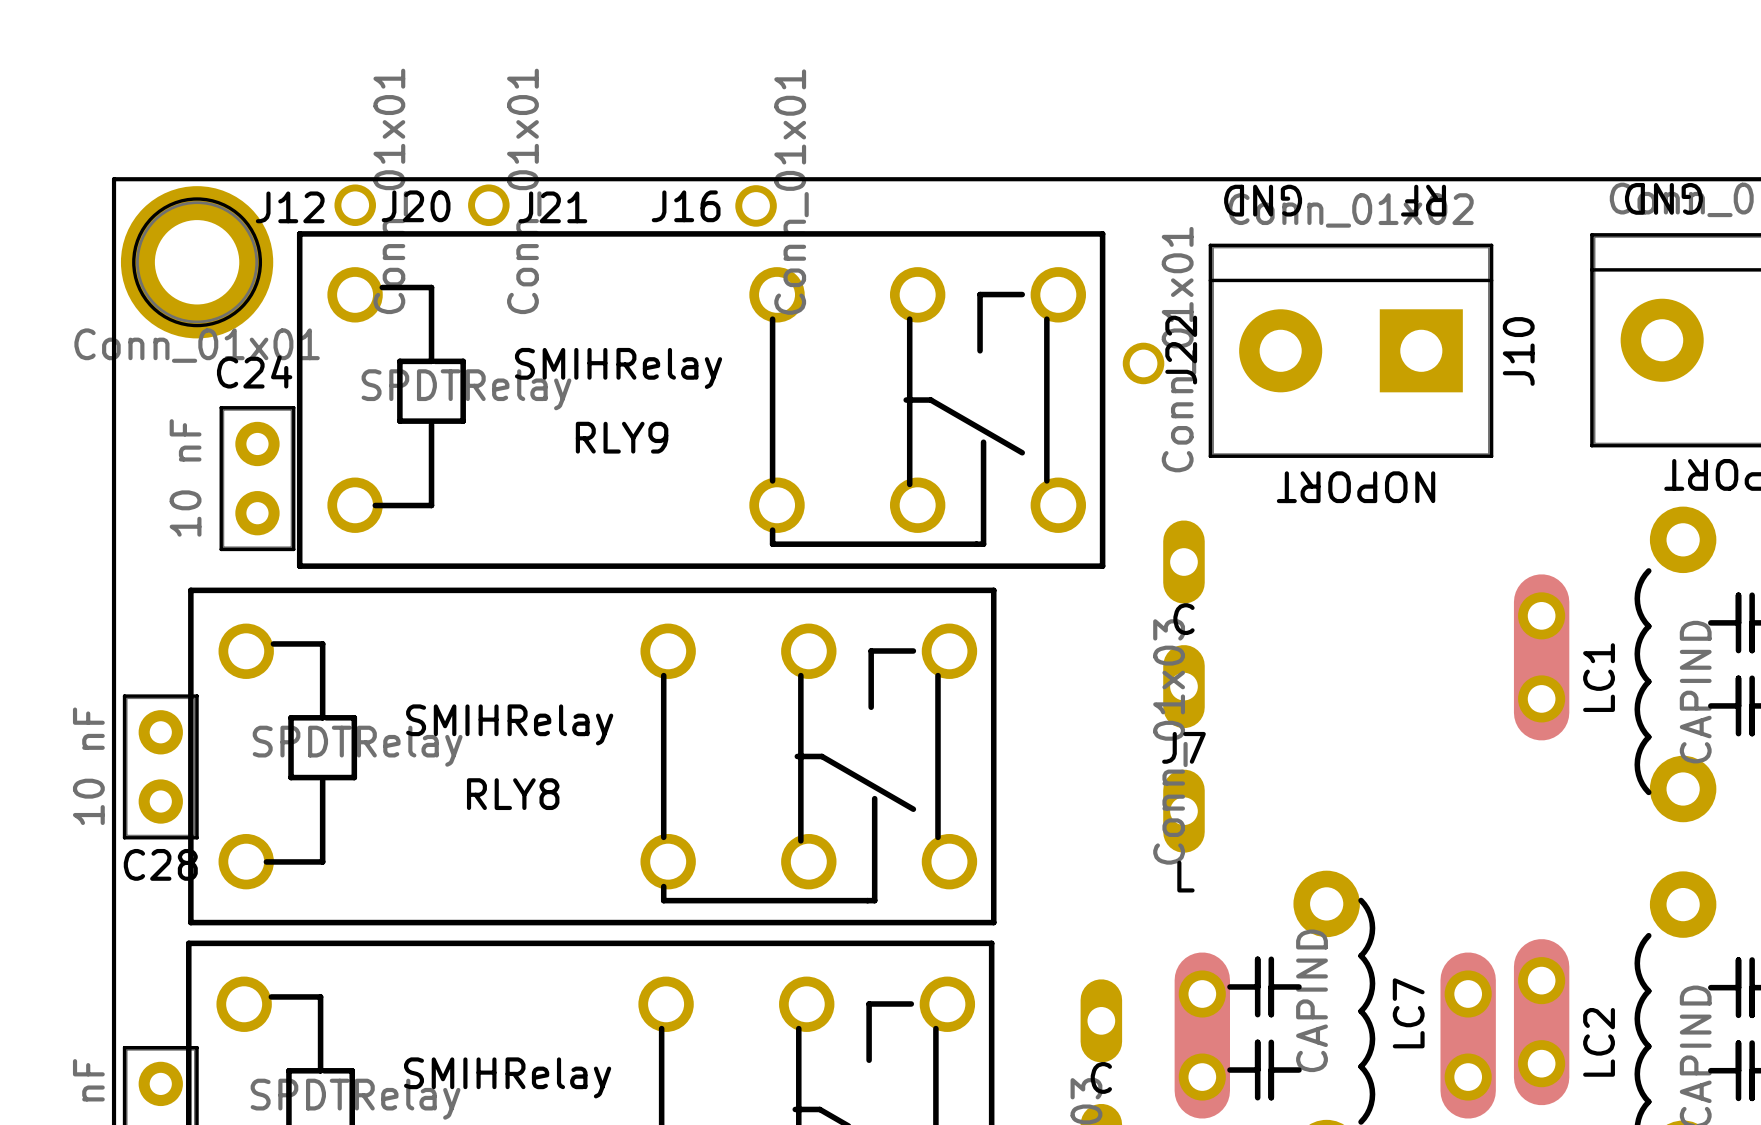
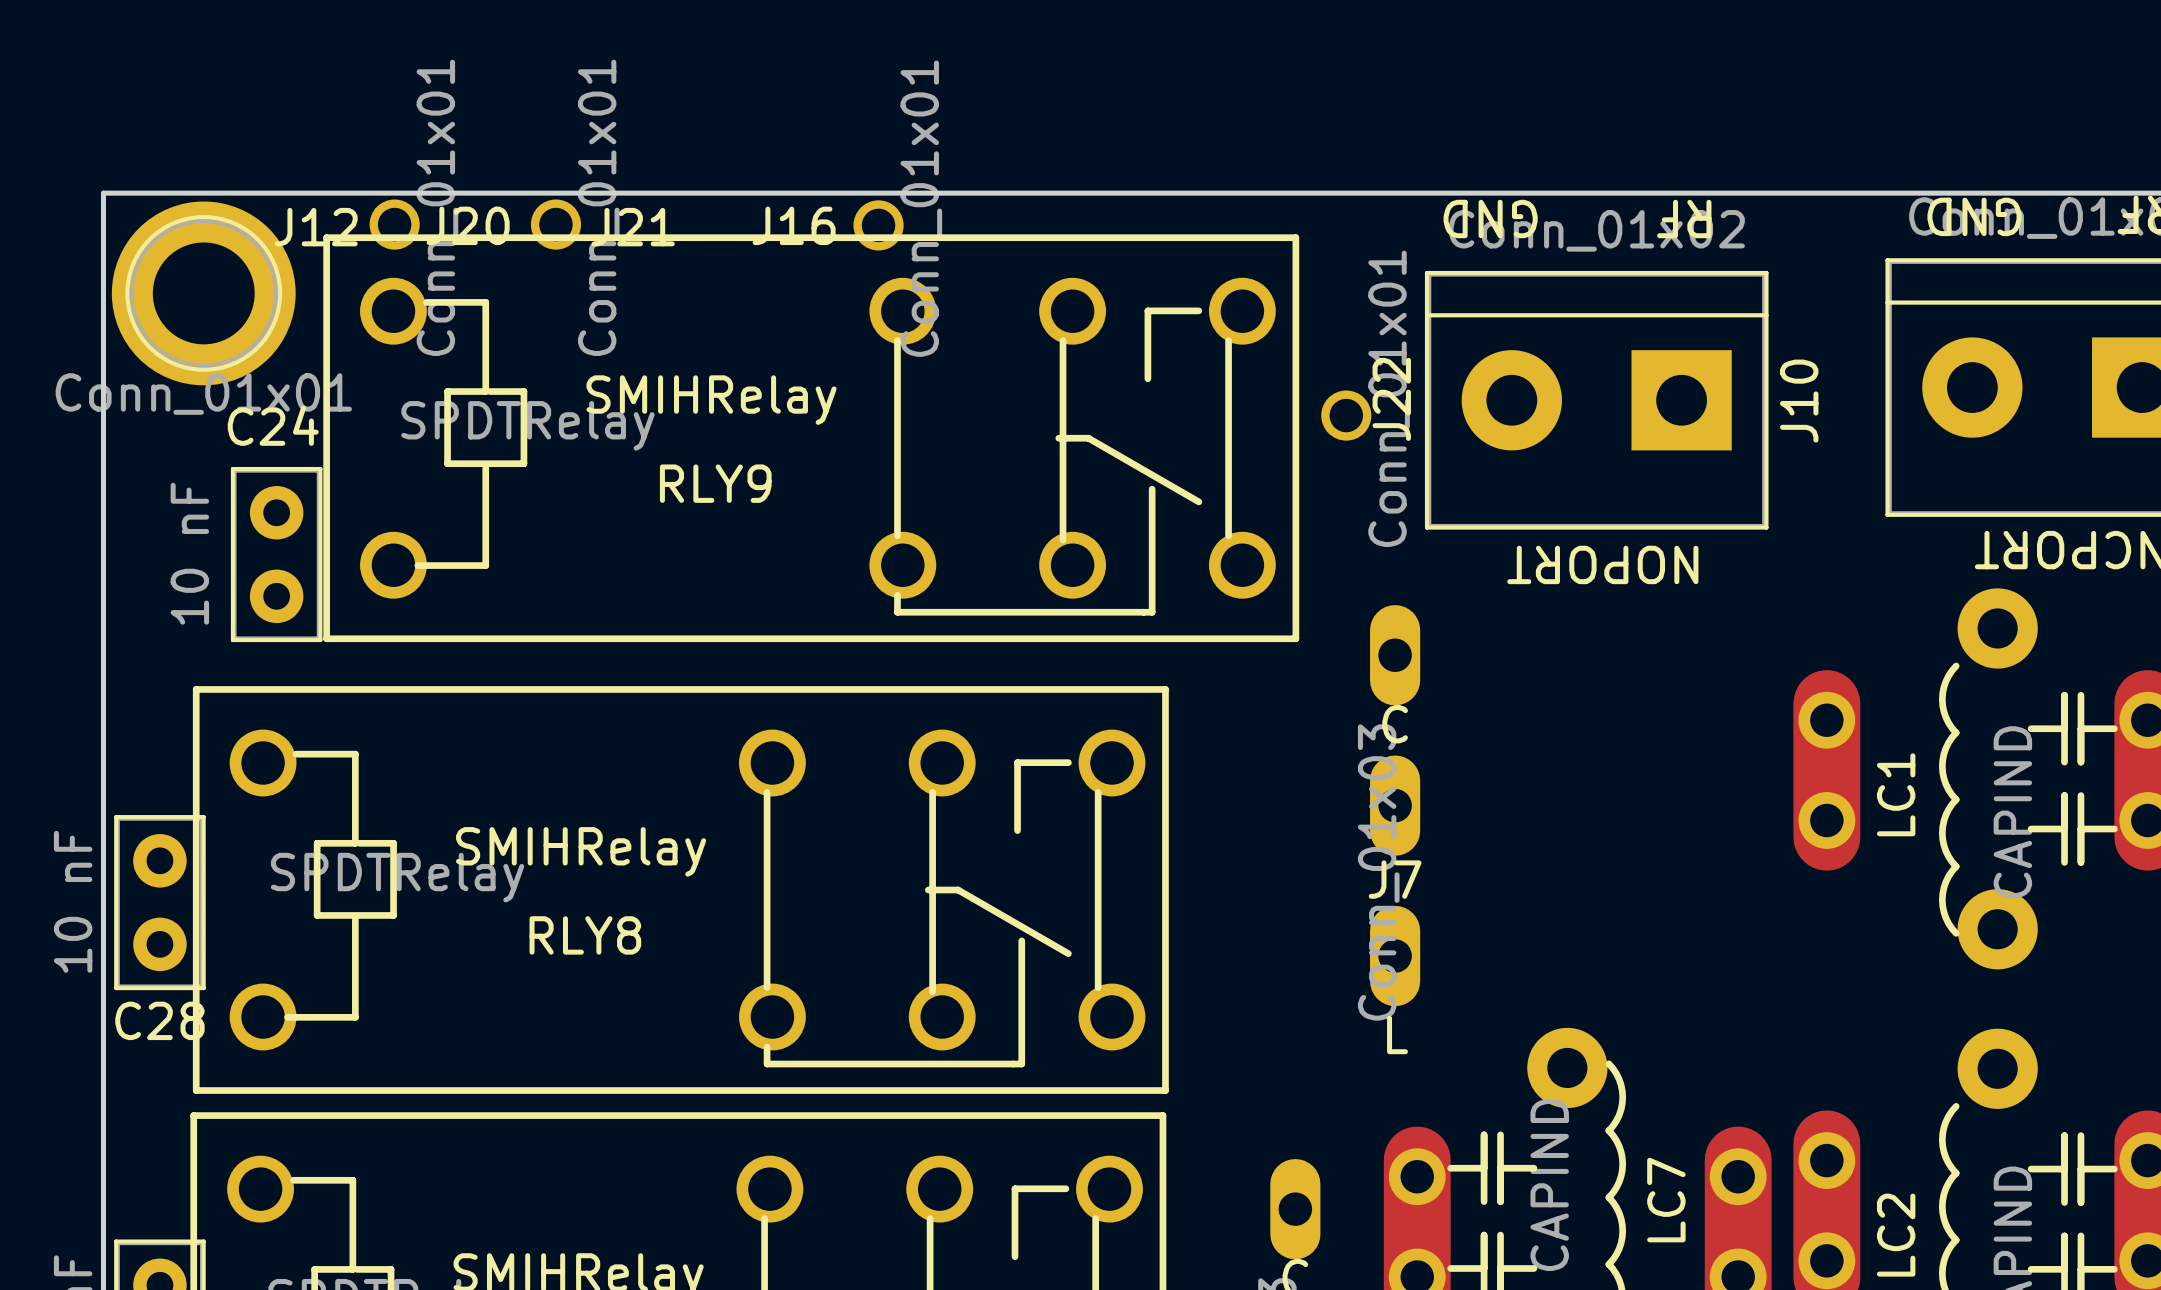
RLY9 position: (701, 400) -> (811, 438)

